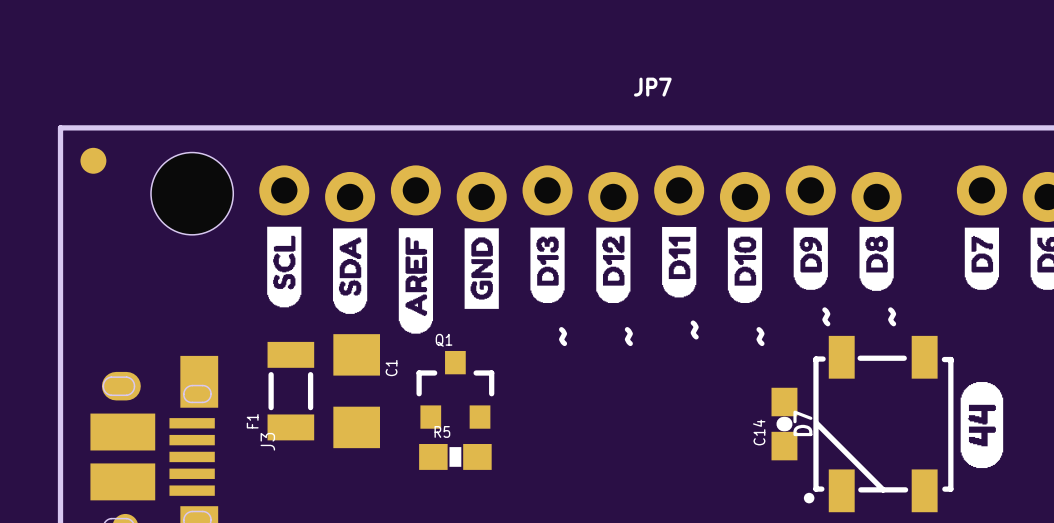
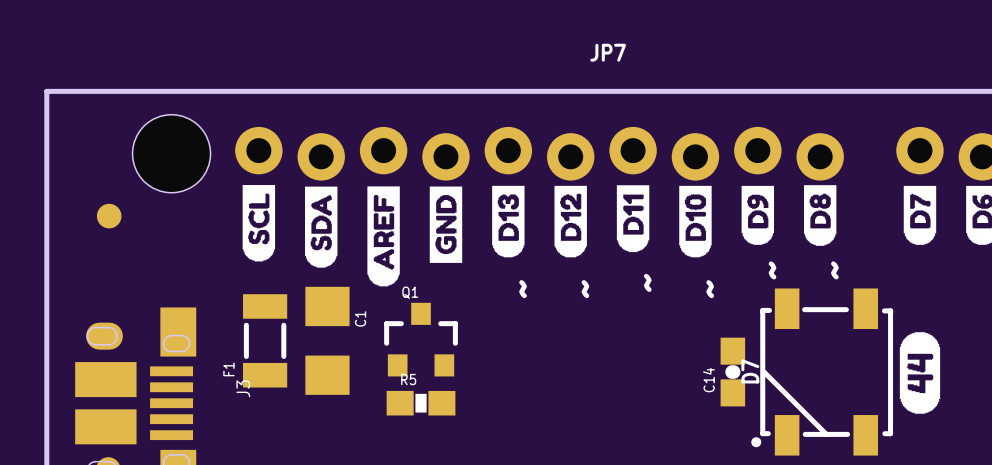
part position: (93, 160) -> (109, 216)

